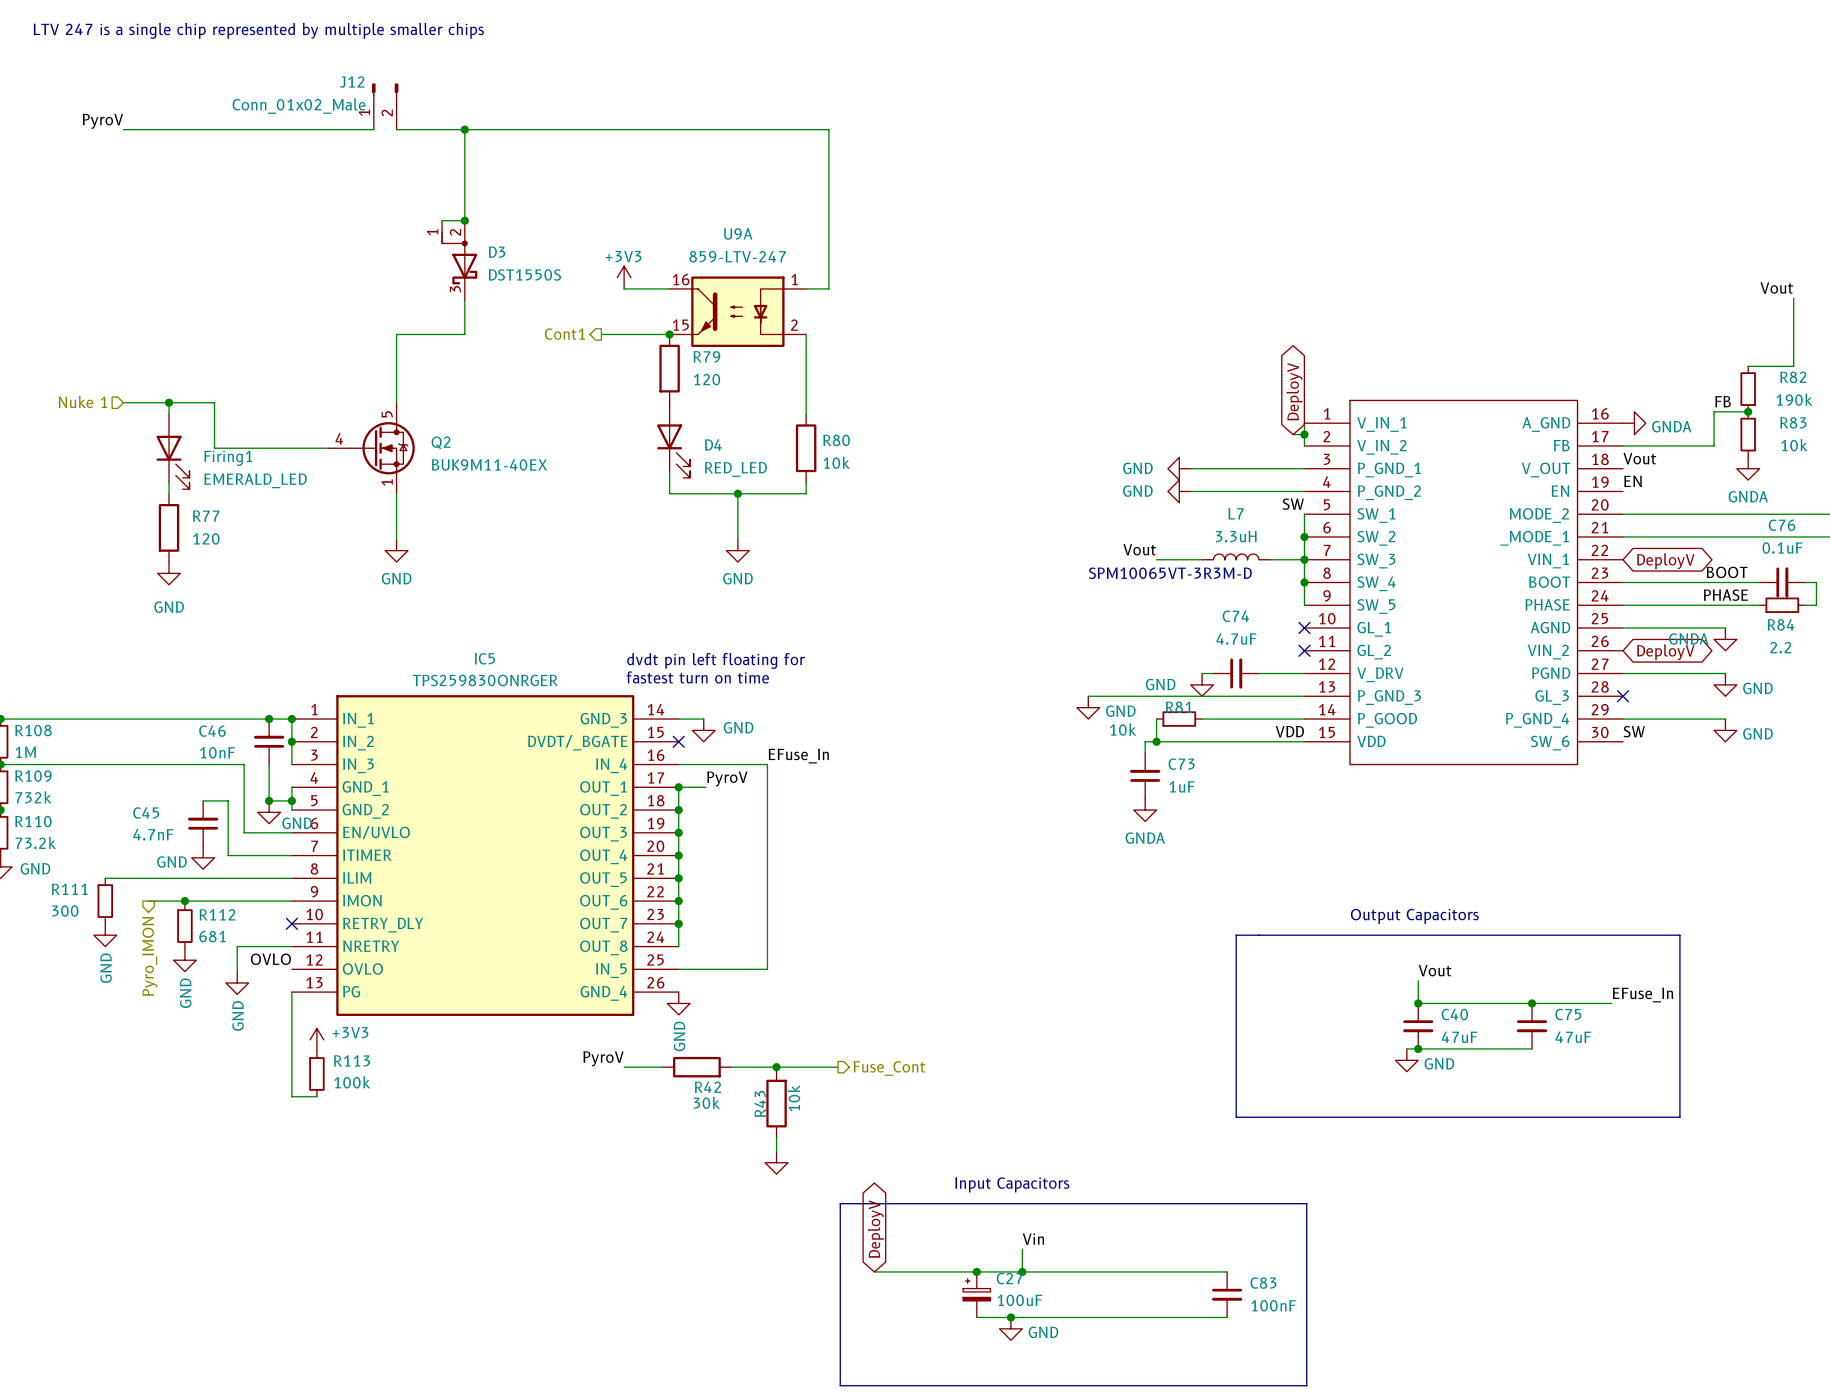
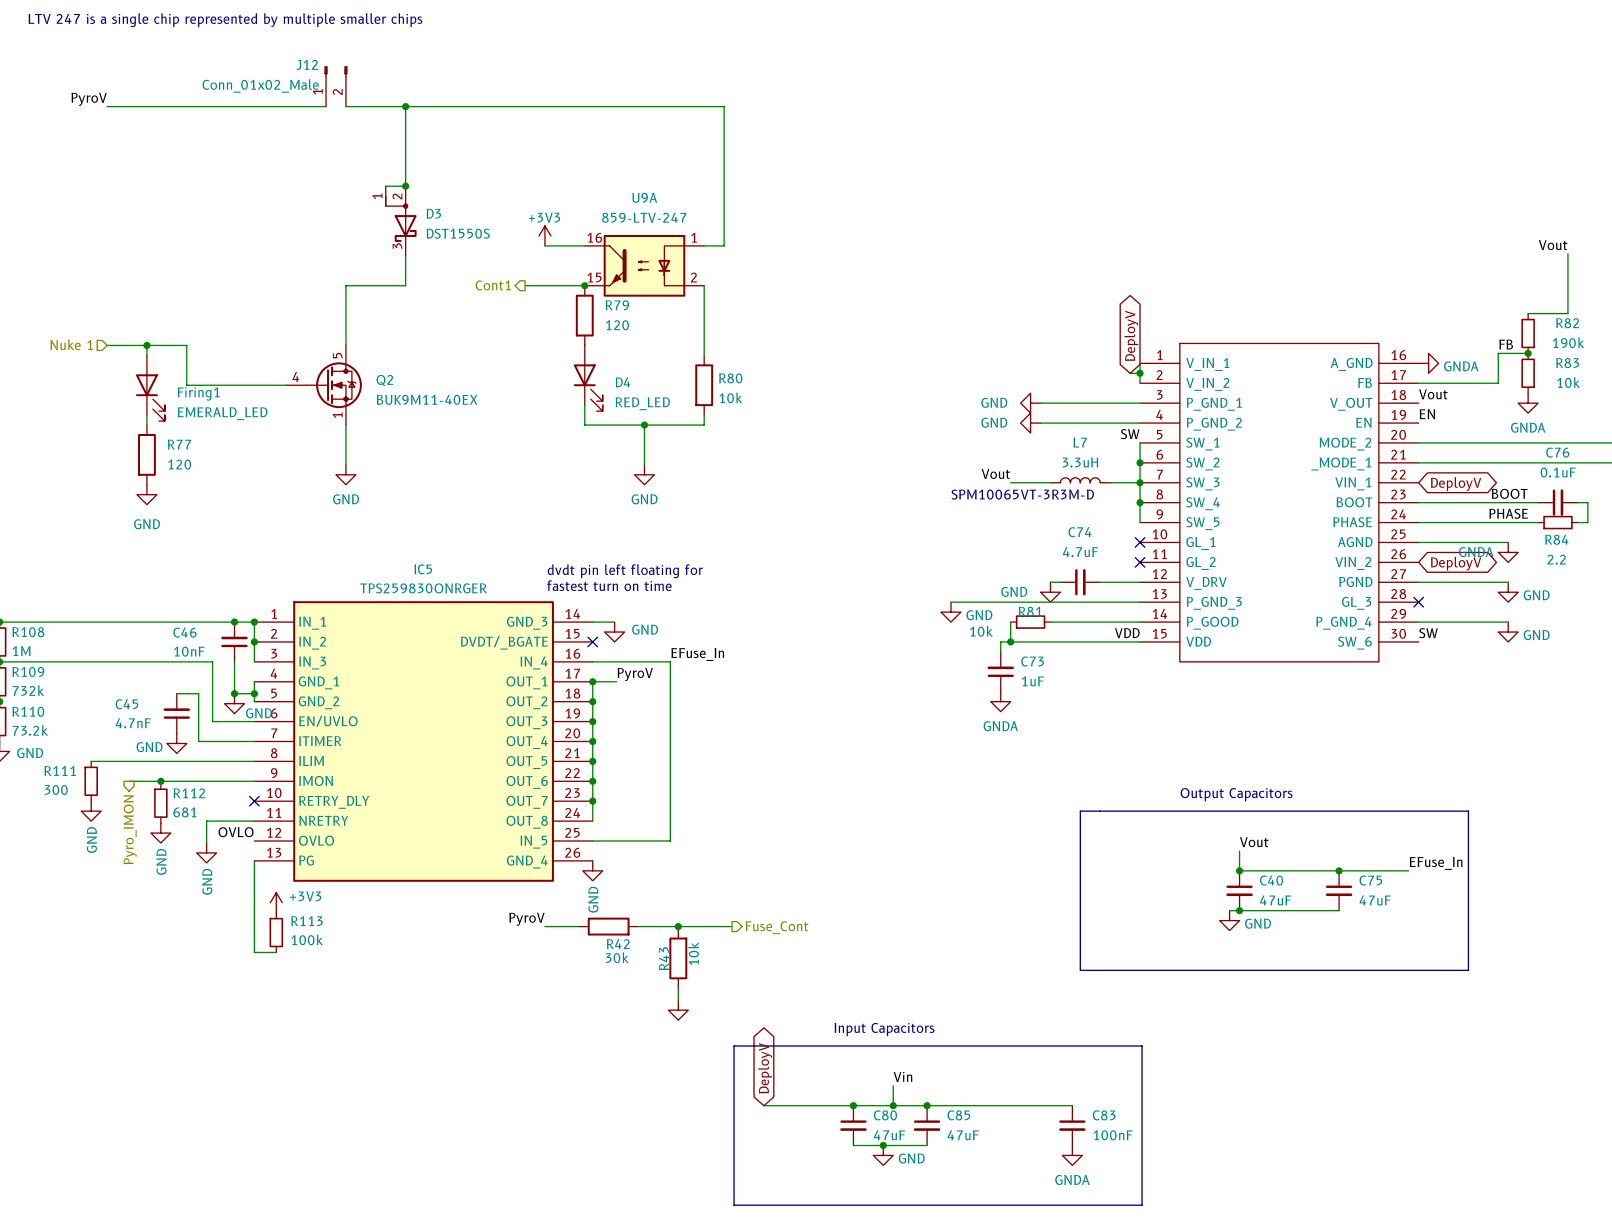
junction: none -> (927, 1105)
C27: 100uF (976, 1294) -> none
C80: none -> 47uF (853, 1125)
C85: none -> 47uF (927, 1125)
wire: (1060, 1317) (1227, 1317) -> none
power symbol: none -> GNDA (1072, 1155)

